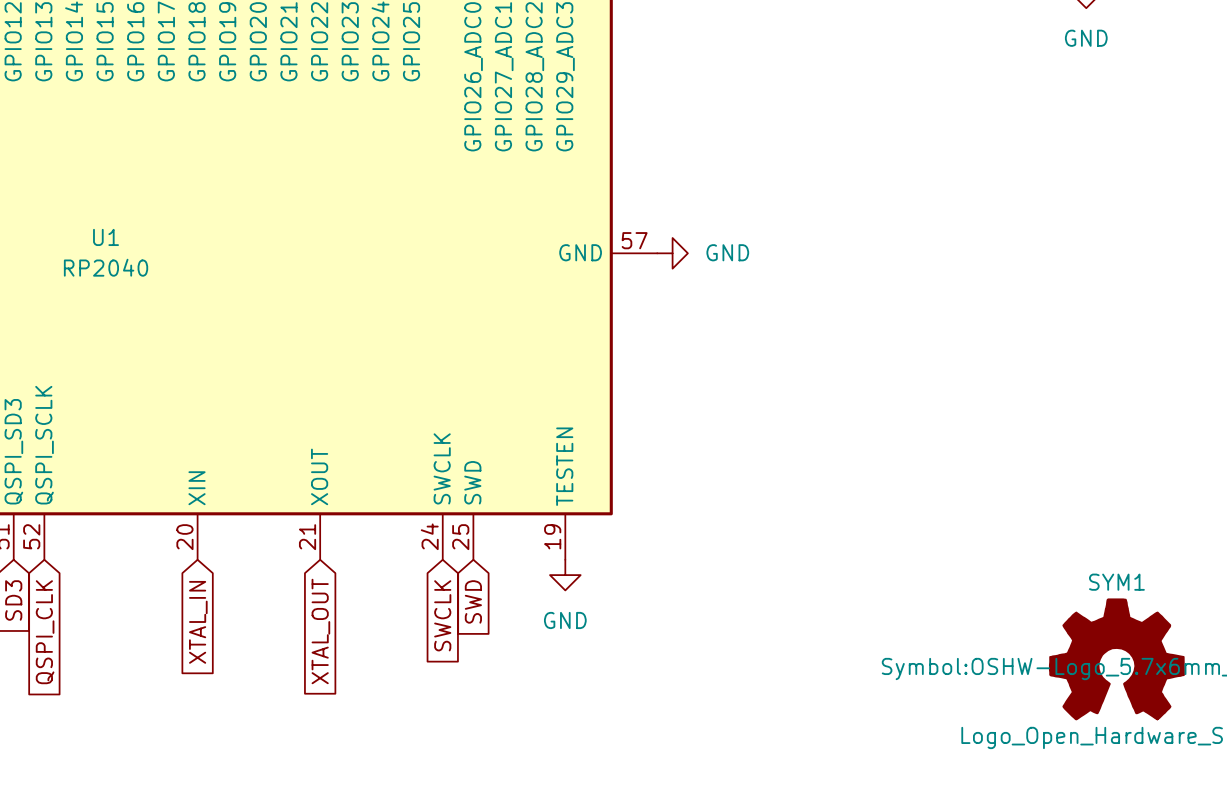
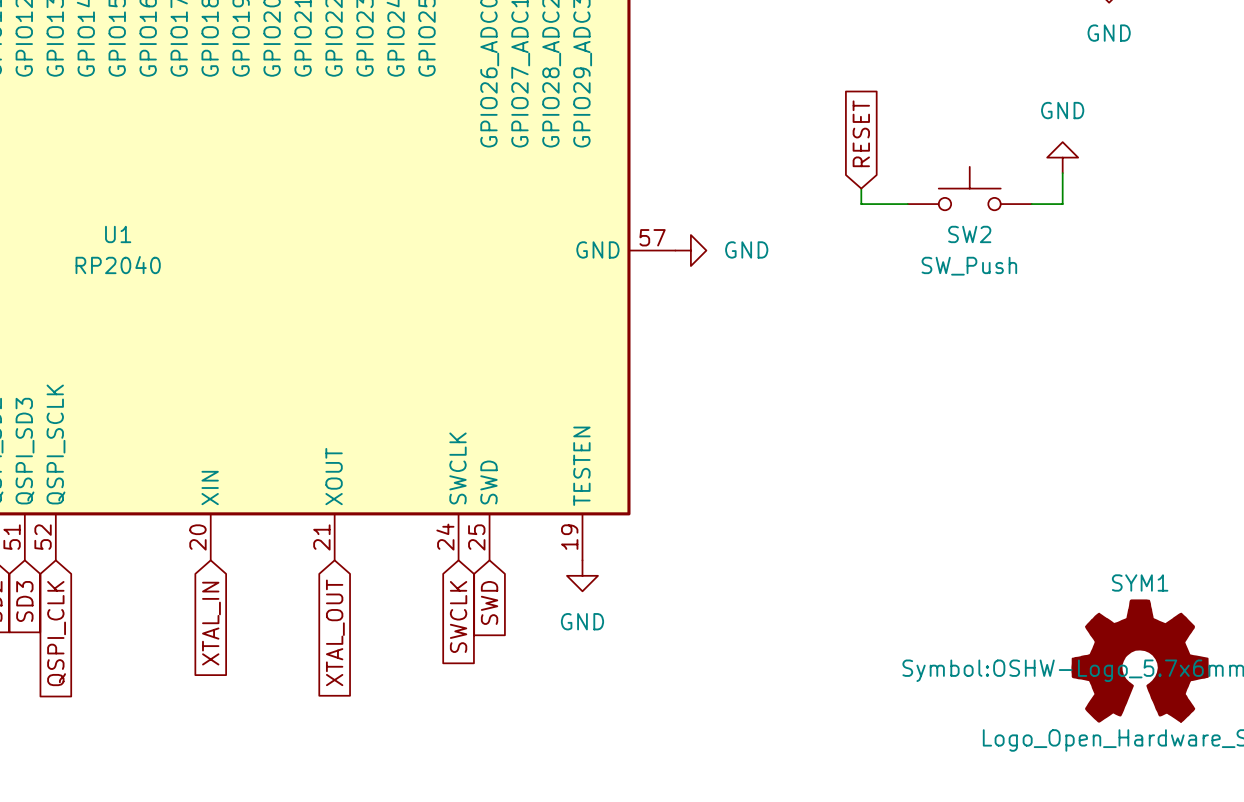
global label: none -> RESET (861, 133)
power symbol: none -> GND (1062, 157)
wire: none -> (1062, 173) (1062, 204) (1031, 204)
wire: none -> (861, 188) (861, 204) (907, 204)
SW2: none -> SW_Push (969, 188)

